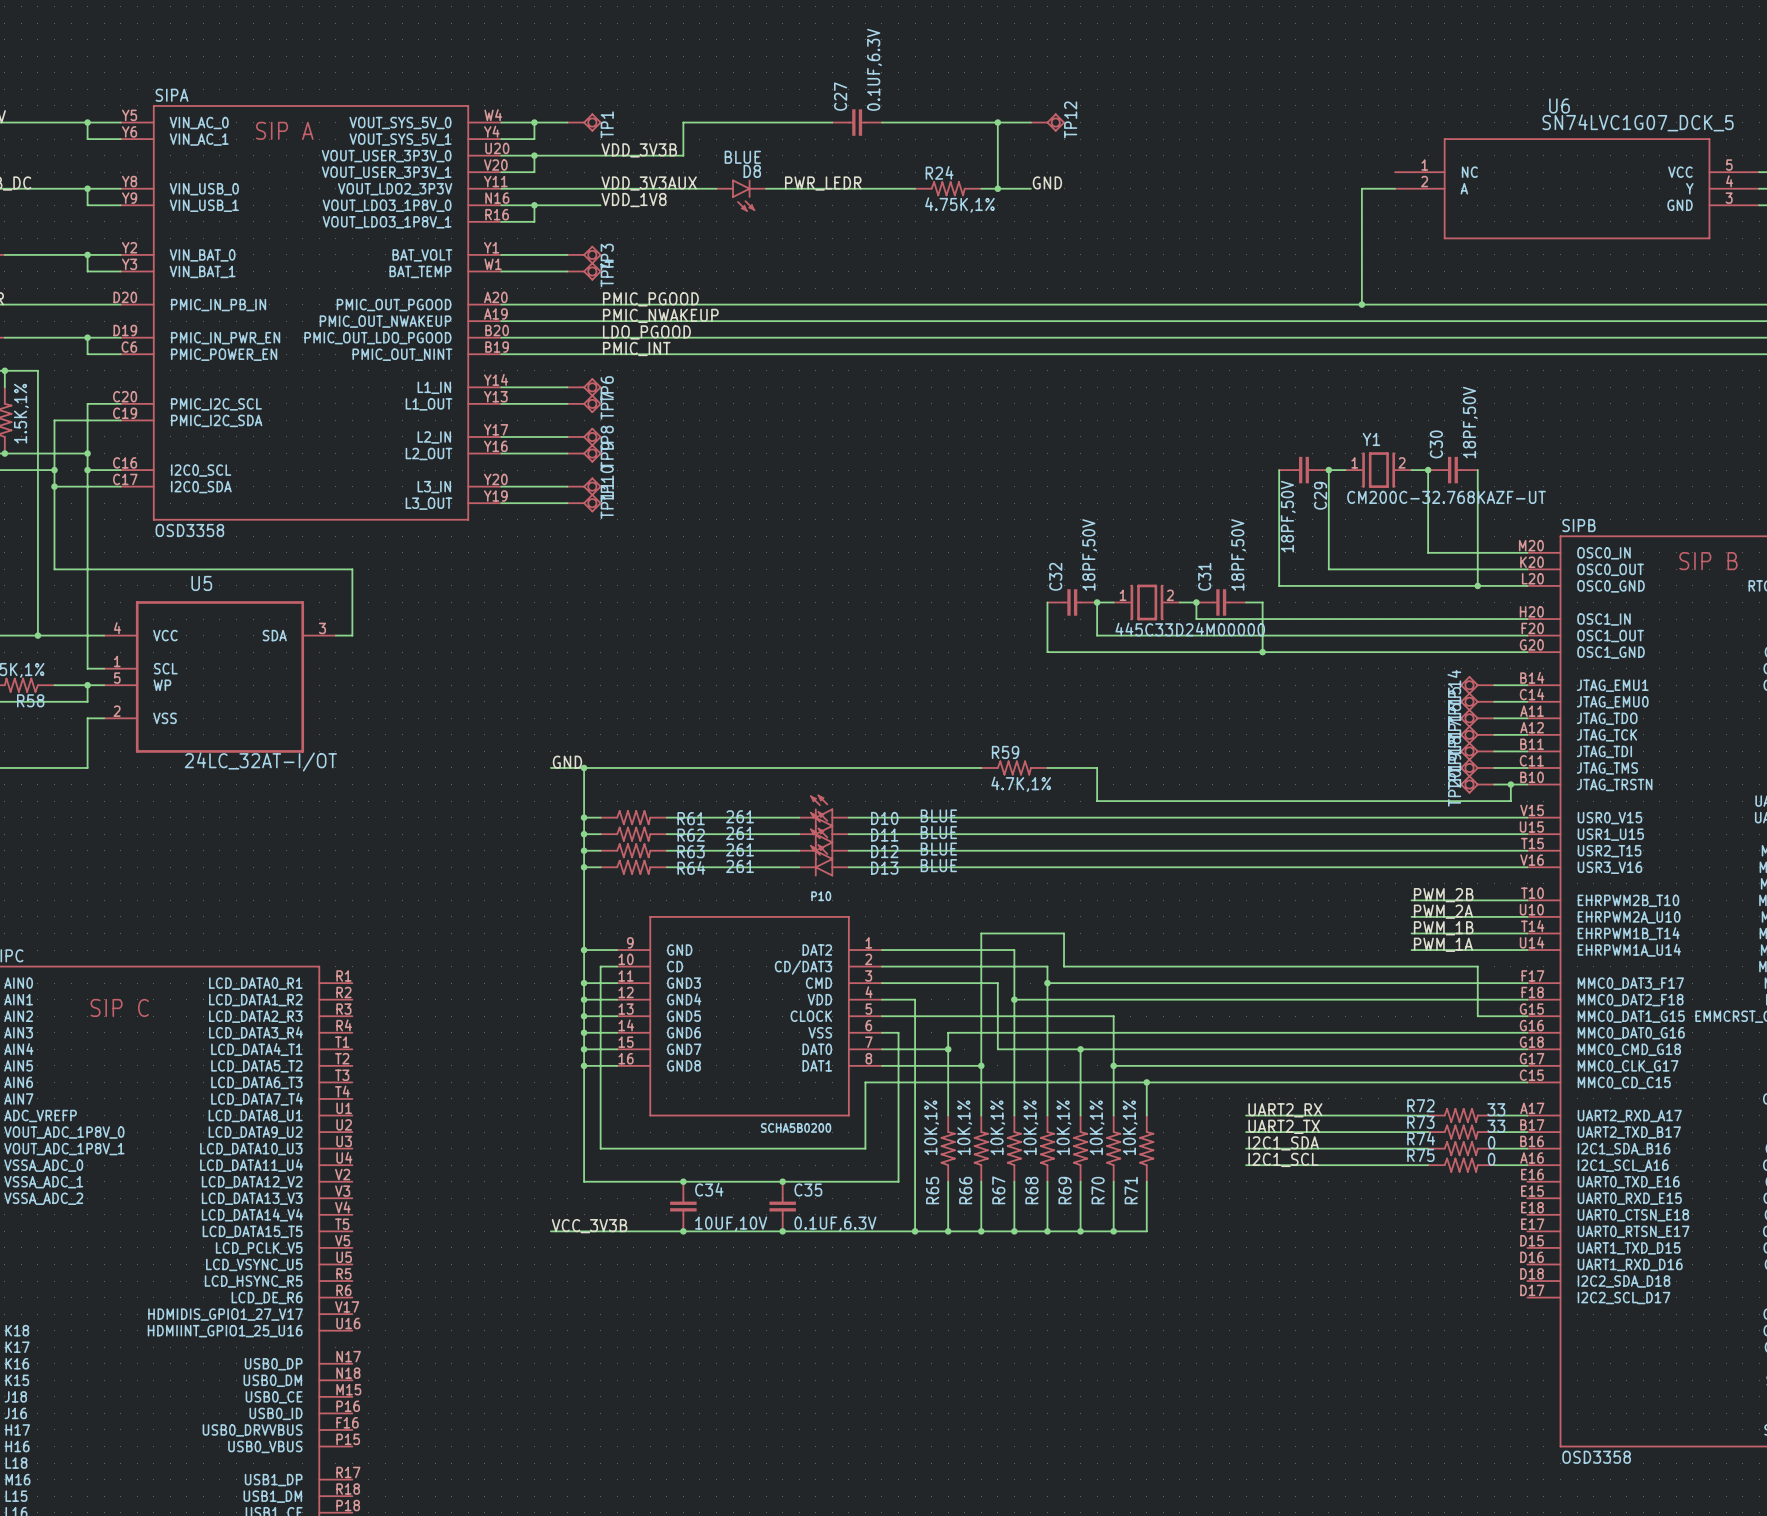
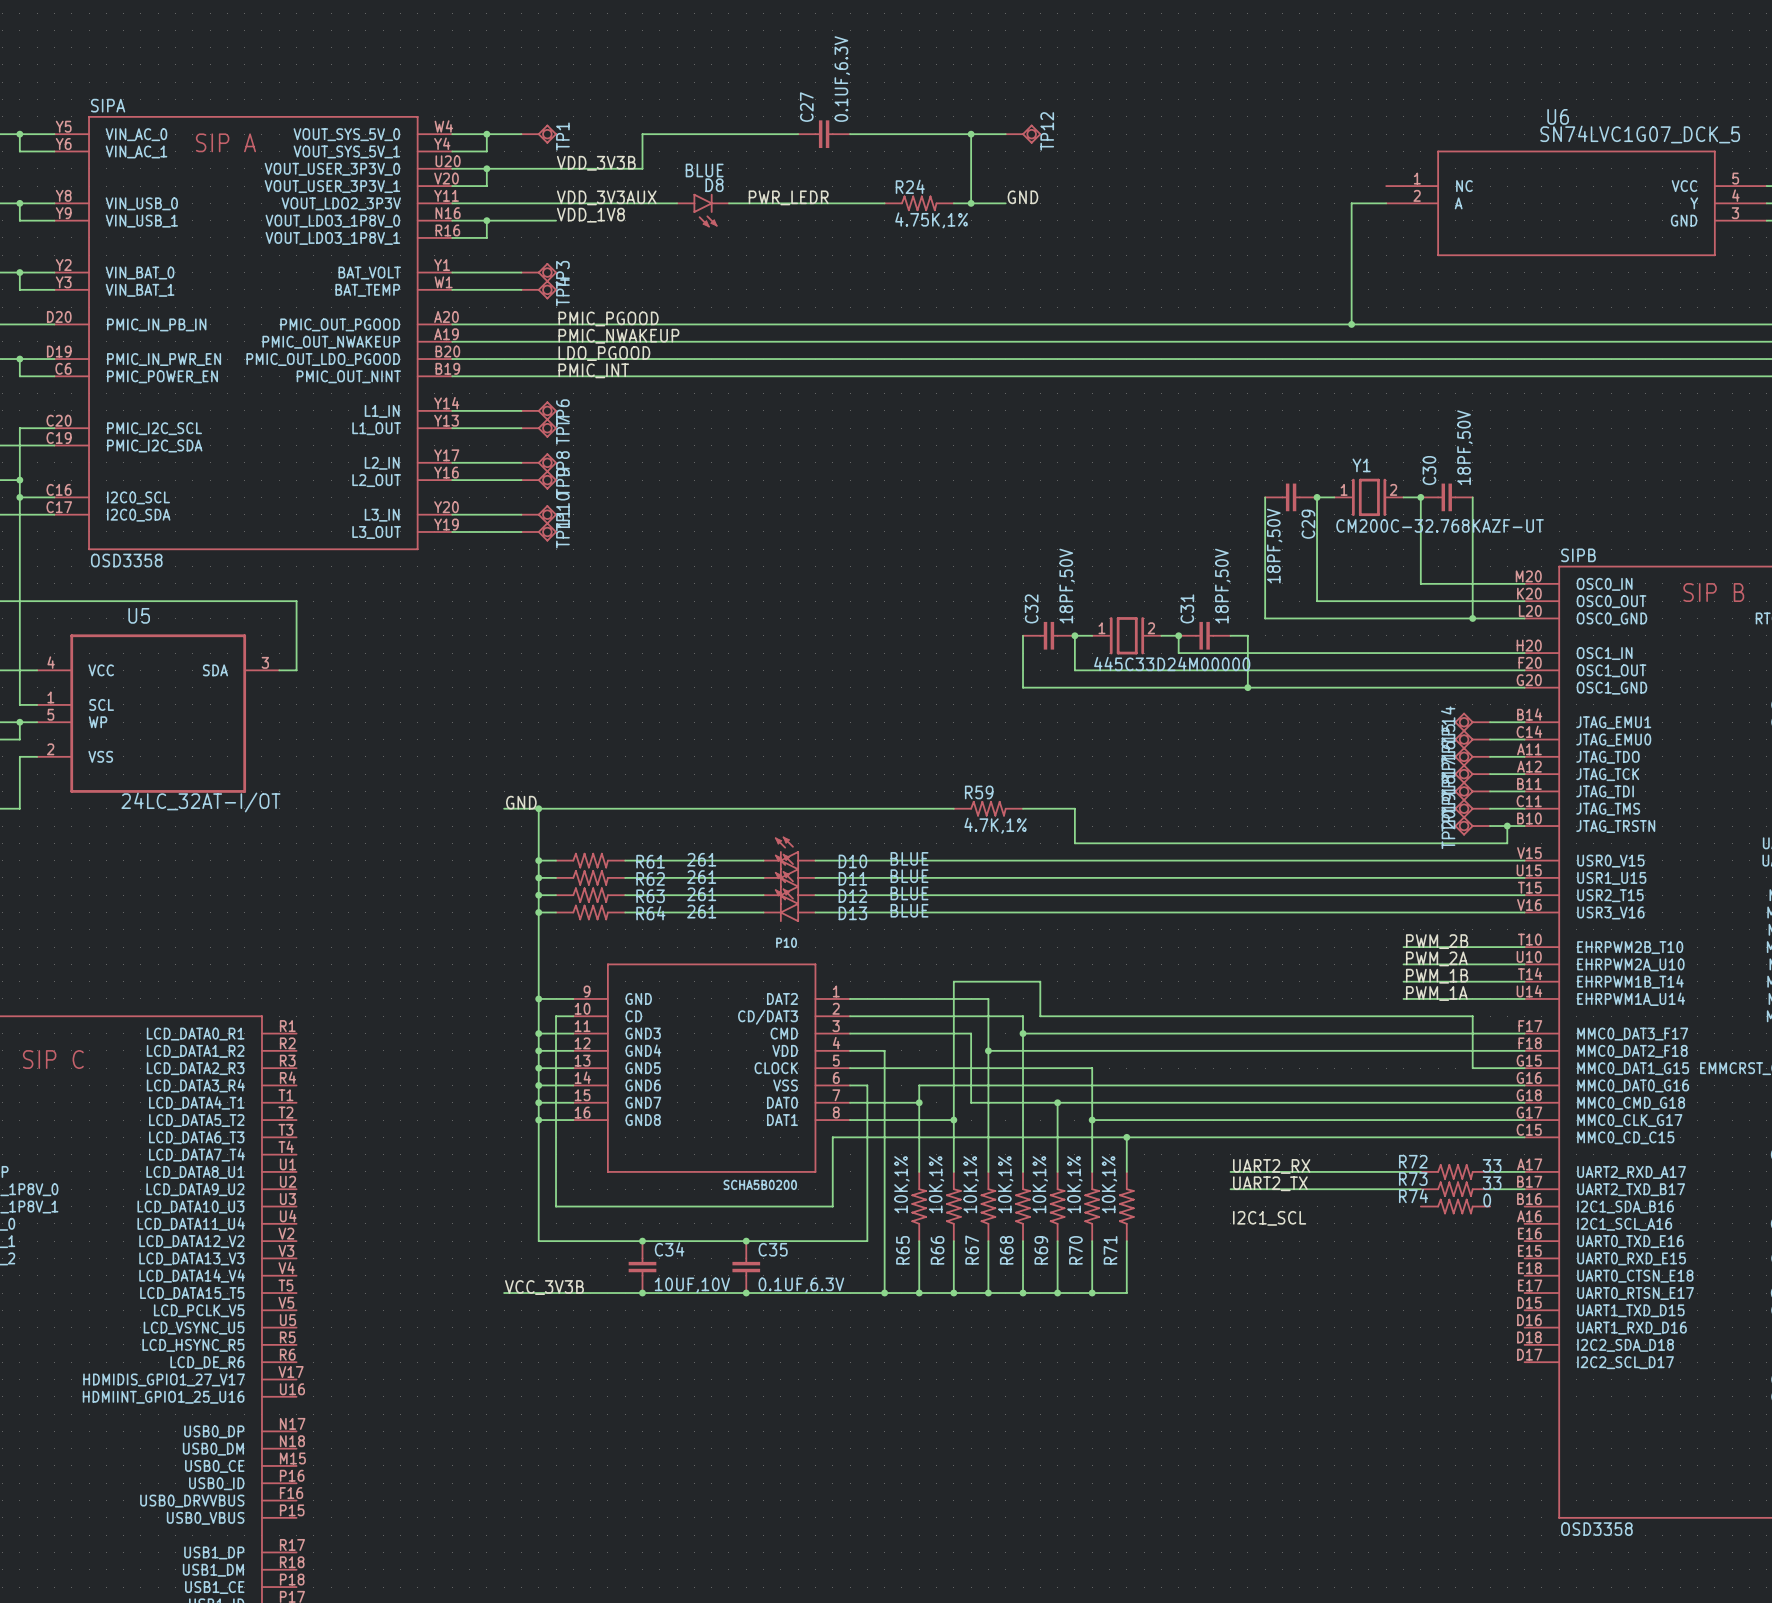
label: I2C1_SDA (1283, 1143) -> none
wire: (1246, 1148) (1428, 1148) -> none
wire: (1494, 1148) (1527, 1148) -> none
wire: (1246, 1165) (1428, 1165) -> none
R75: 0 (1461, 1165) -> none
wire: (1494, 1165) (1527, 1165) -> none

